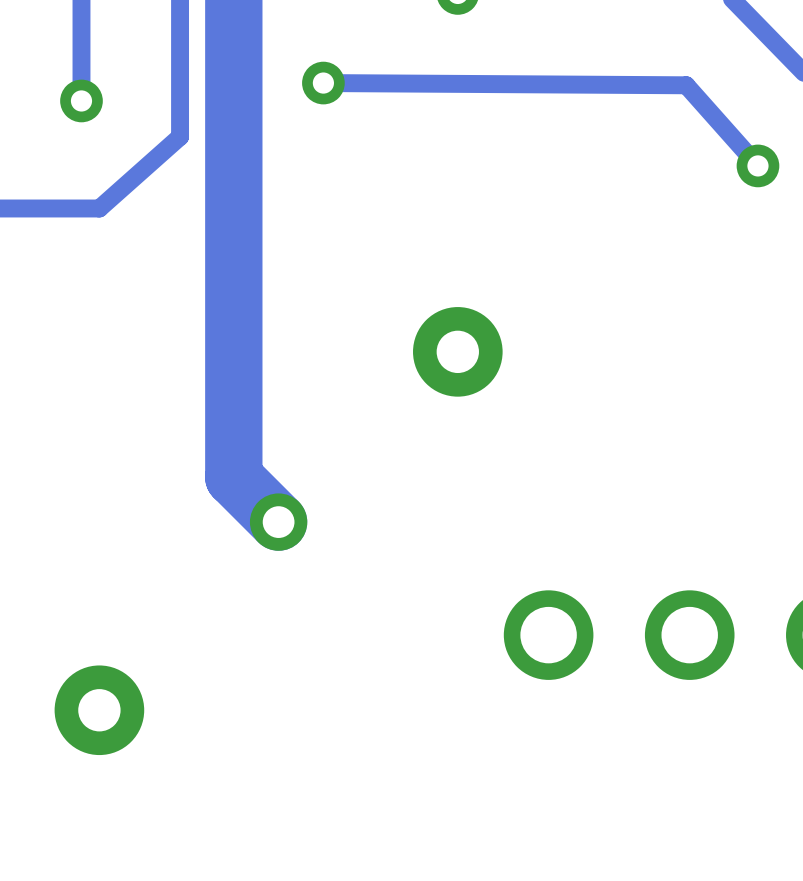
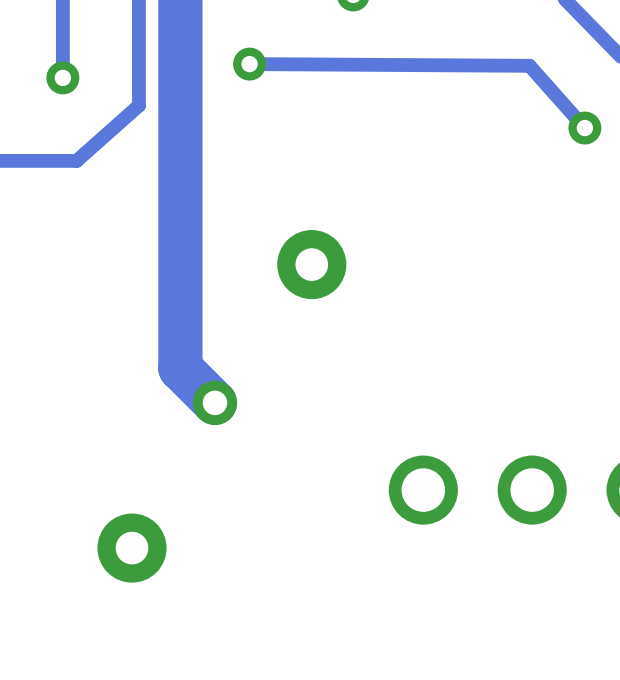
via position: (457, 351) -> (311, 264)
via position: (99, 710) -> (132, 548)

